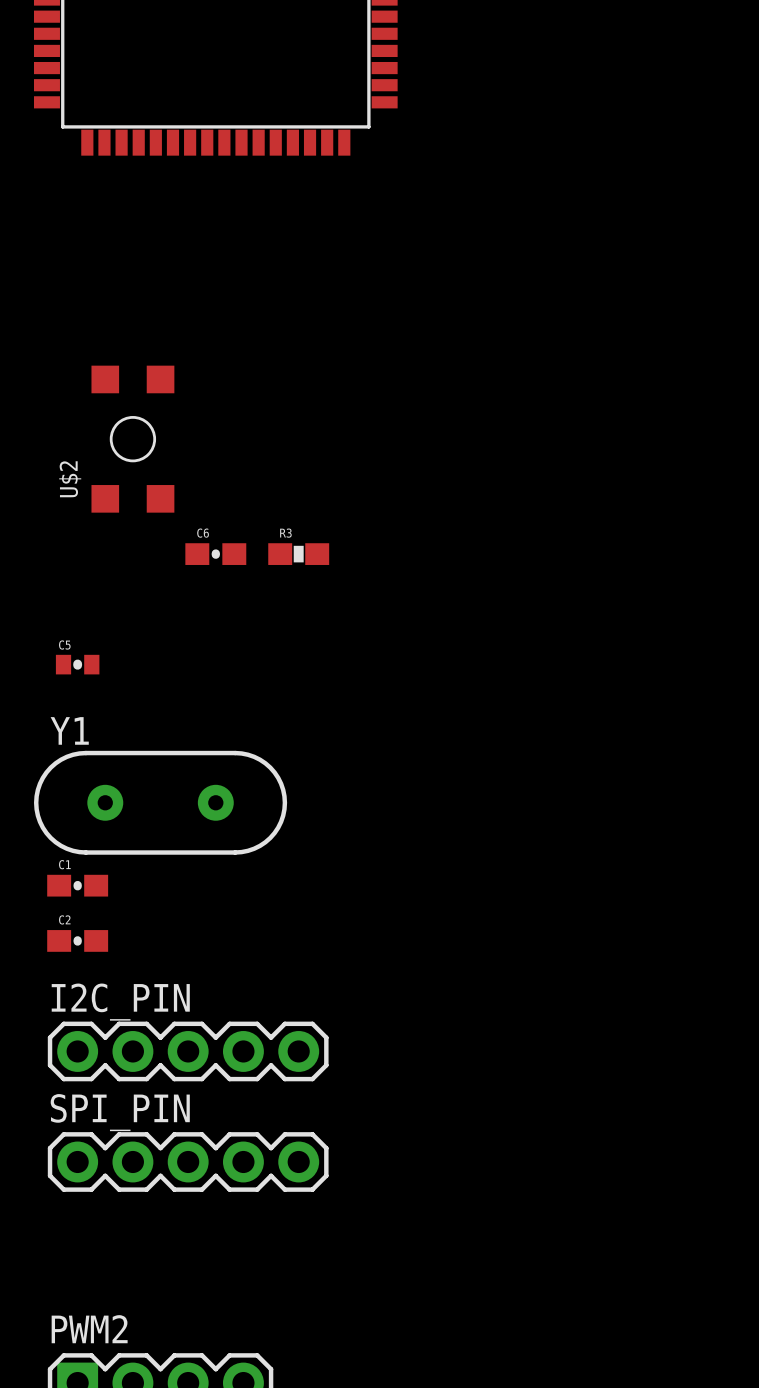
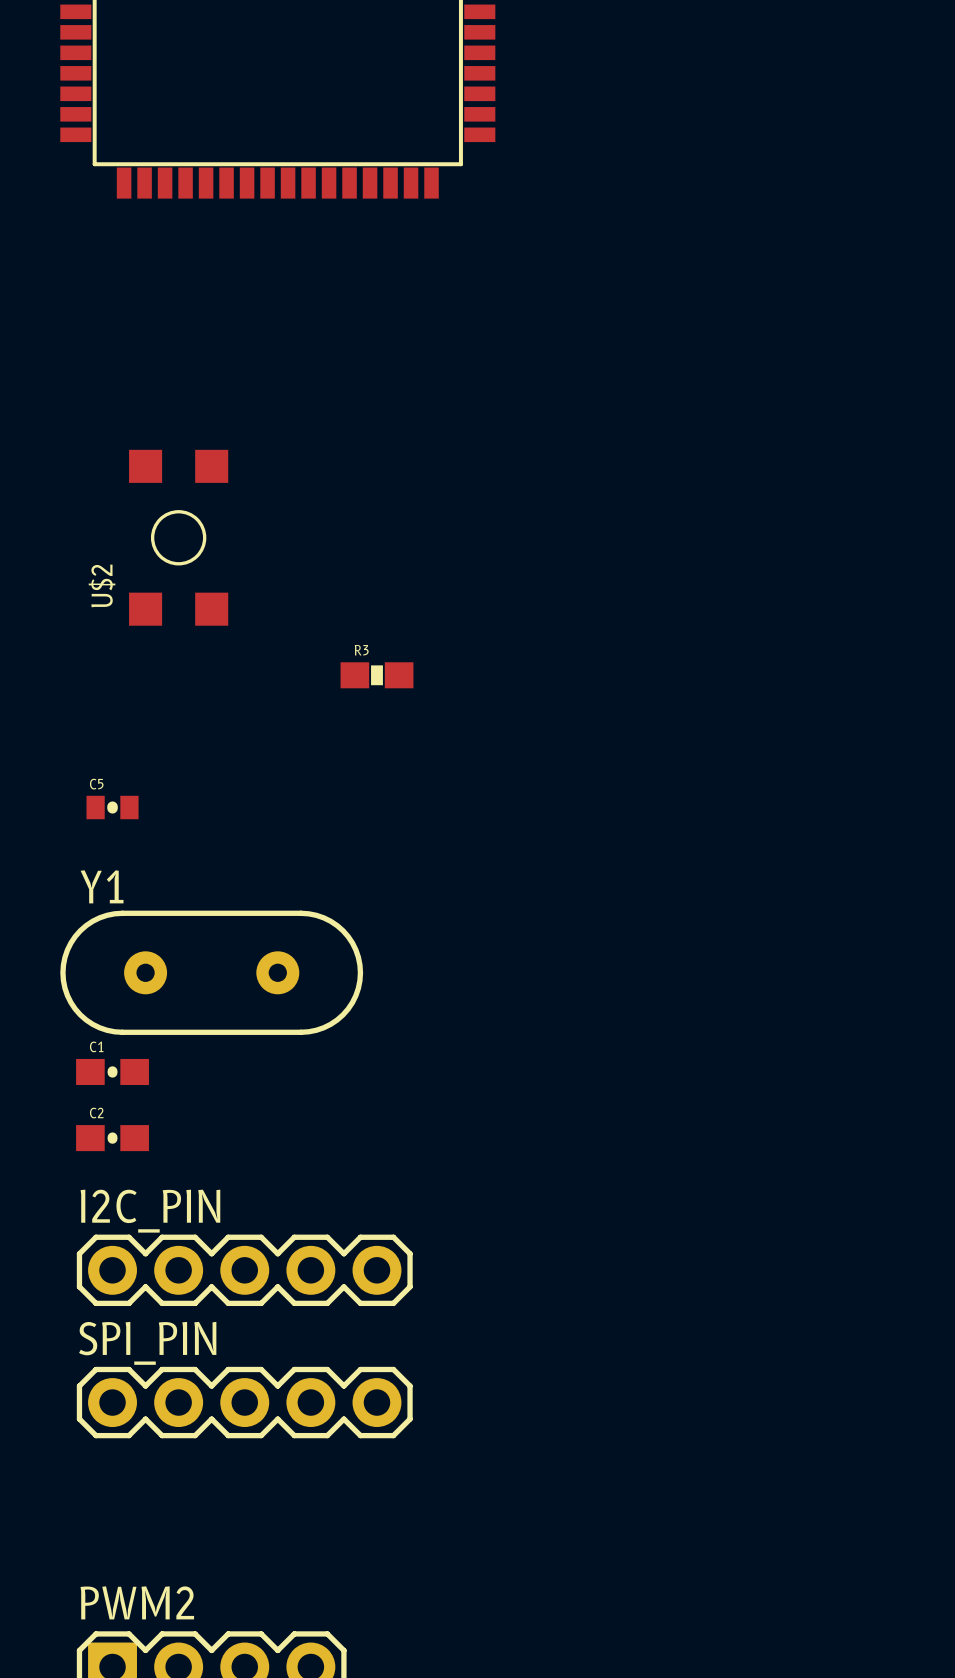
C6: (215, 554) -> none

